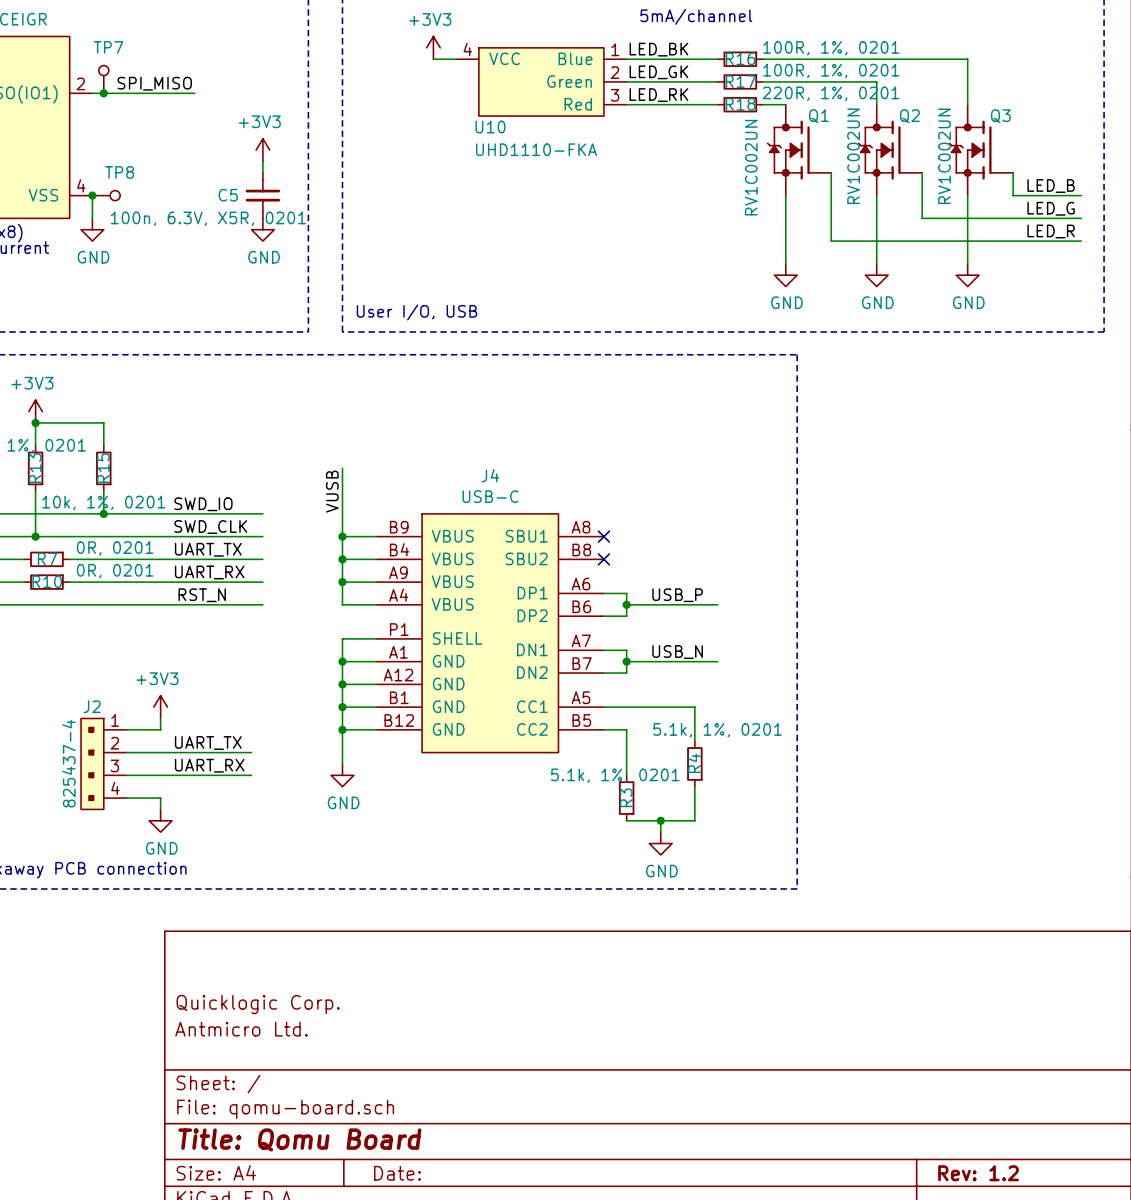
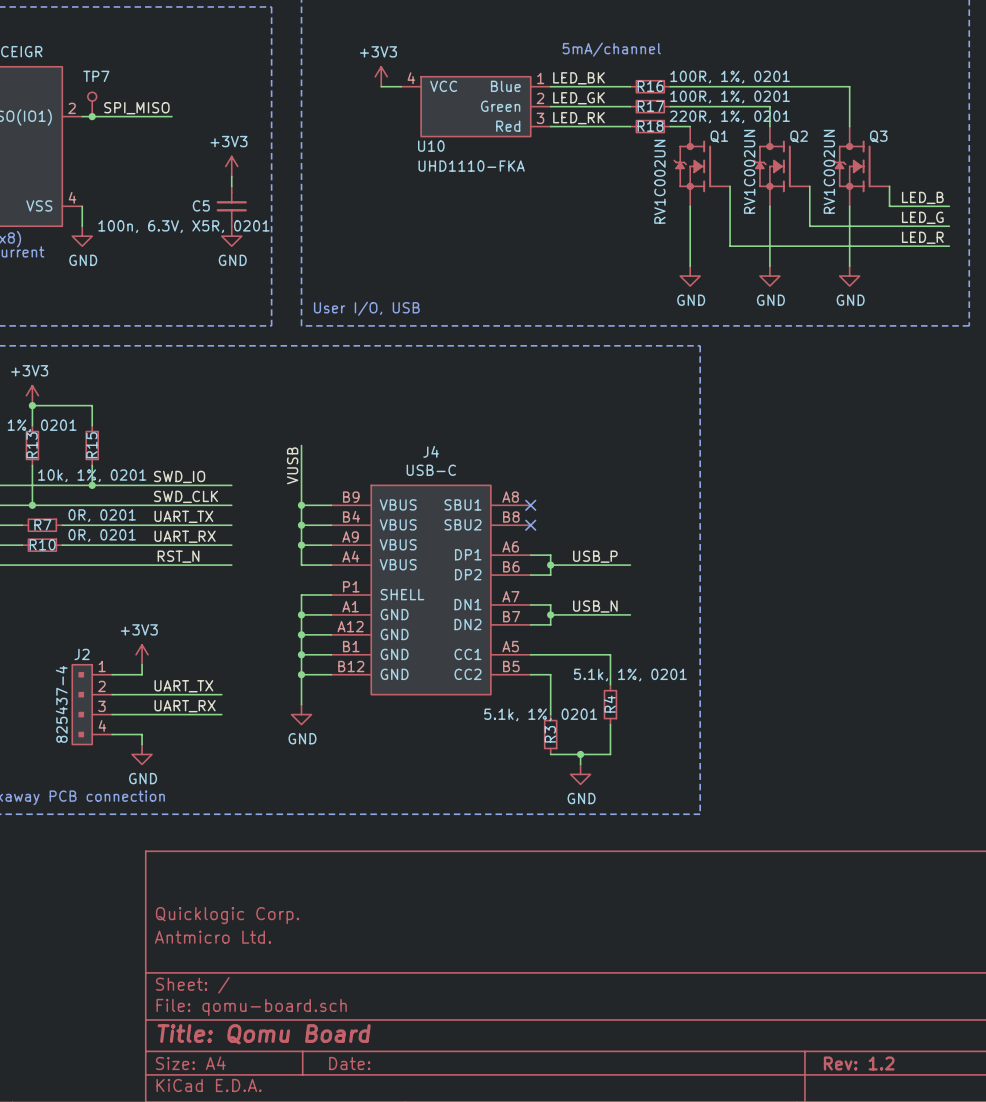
junction: (92, 195) -> none
TP8: (106, 195) -> none

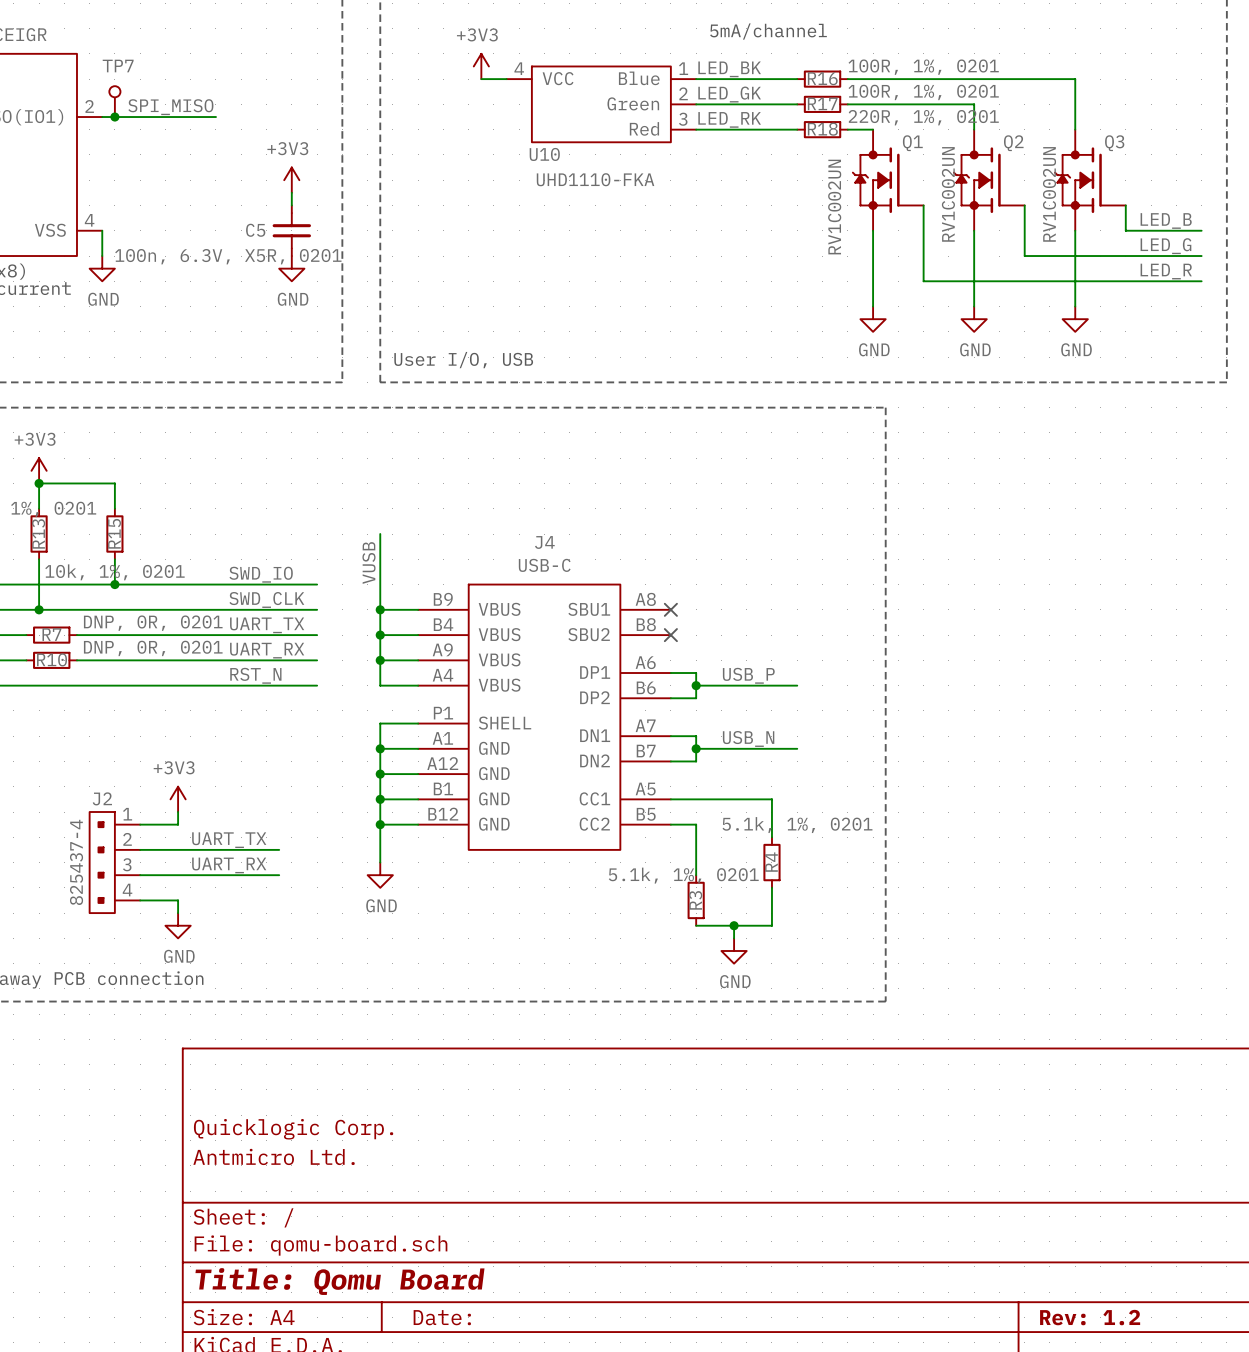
label position: SWD_IO (179, 476) -> SWD_IO (261, 574)
wire: none -> (291, 584) (317, 584)
label position: SWD_CLK (186, 496) -> SWD_CLK (266, 599)
wire: none -> (291, 609) (317, 609)
R7 value: 0R, 0201 (102, 515) -> DNP, 0R, 0201 (153, 623)
label position: UART_TX (183, 516) -> UART_TX (267, 625)
wire: none -> (291, 635) (317, 635)
R10 value: 0R, 0201 (102, 535) -> DNP, 0R, 0201 (153, 648)
label position: UART_RX (185, 536) -> UART_RX (267, 650)
wire: none -> (291, 660) (317, 660)
label position: RST_N (178, 556) -> RST_N (255, 675)
wire: none -> (291, 685) (317, 685)

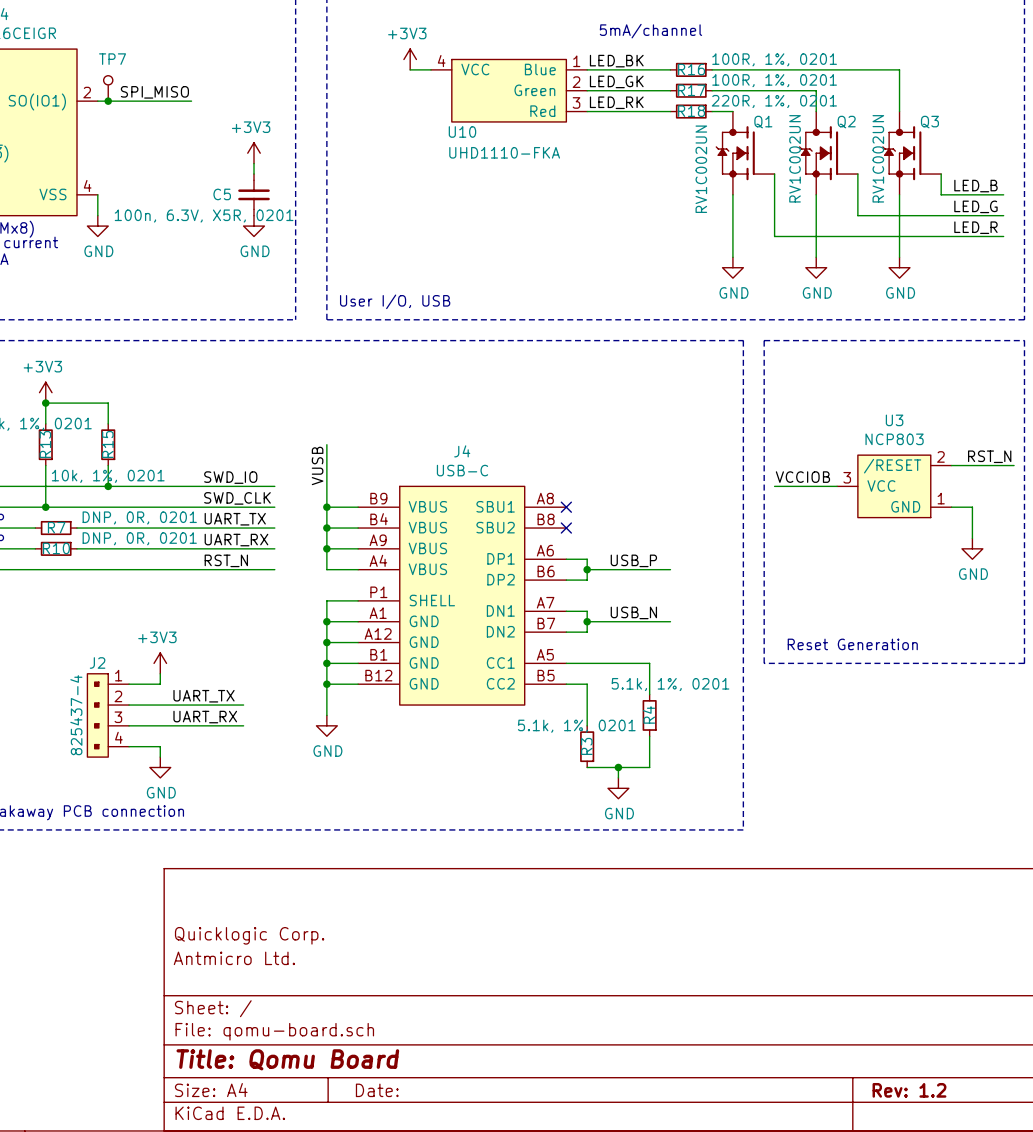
line: none -> (764, 340) (1024, 340) (1024, 663) (764, 663) (764, 340)
label: none -> RST_N (989, 456)
wire: none -> (951, 465) (1014, 465)
label: none -> VCCIOB (802, 477)
wire: none -> (774, 486) (837, 486)
U3: none -> NCP803 (894, 486)
wire: none -> (951, 507) (972, 507) (972, 538)
power symbol: none -> GND (972, 548)
text: none -> Reset Generation (852, 644)

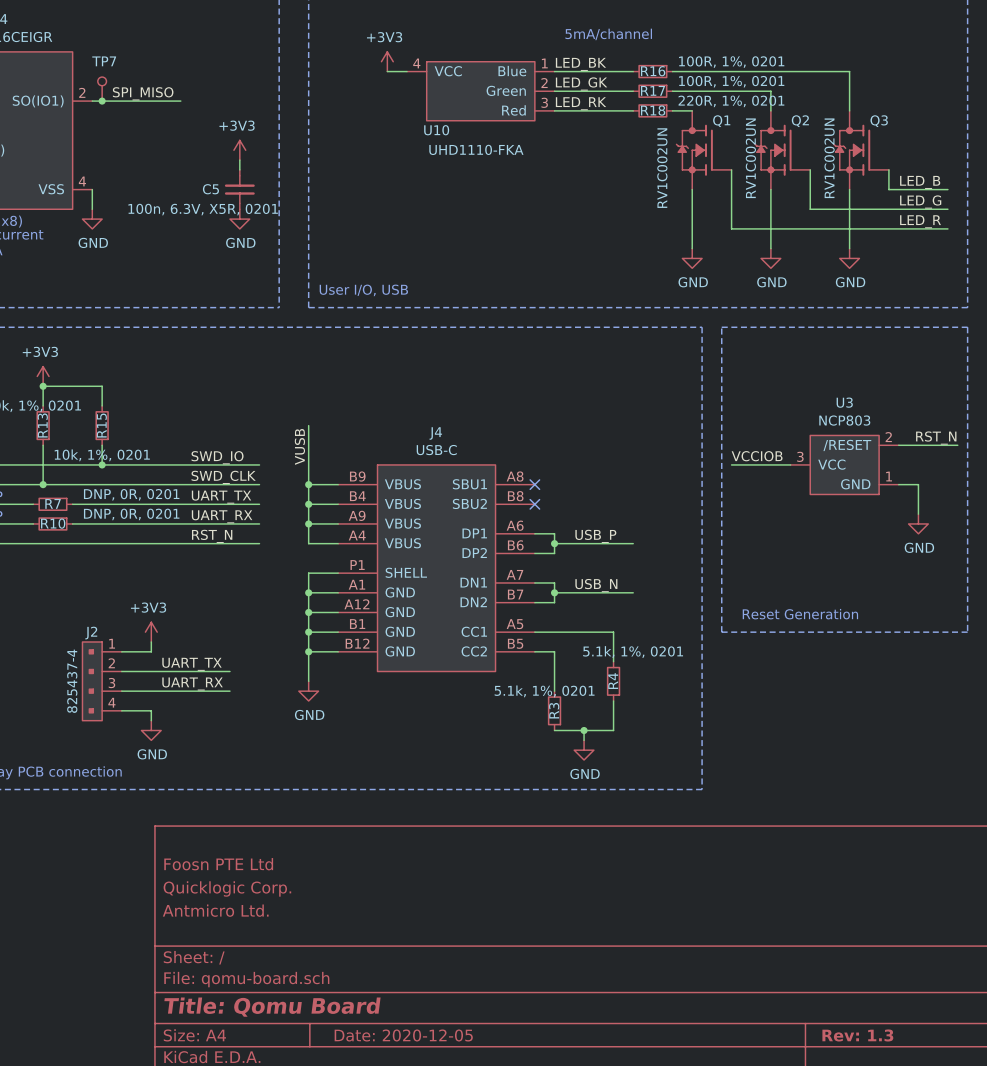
title block: none -> Foosn PTE Ltd (218, 864)
title block: Date: (377, 1090) -> Date: 2020-12-05 (403, 1035)
title block: Rev: 1.2 (909, 1090) -> Rev: 1.3 (857, 1035)

